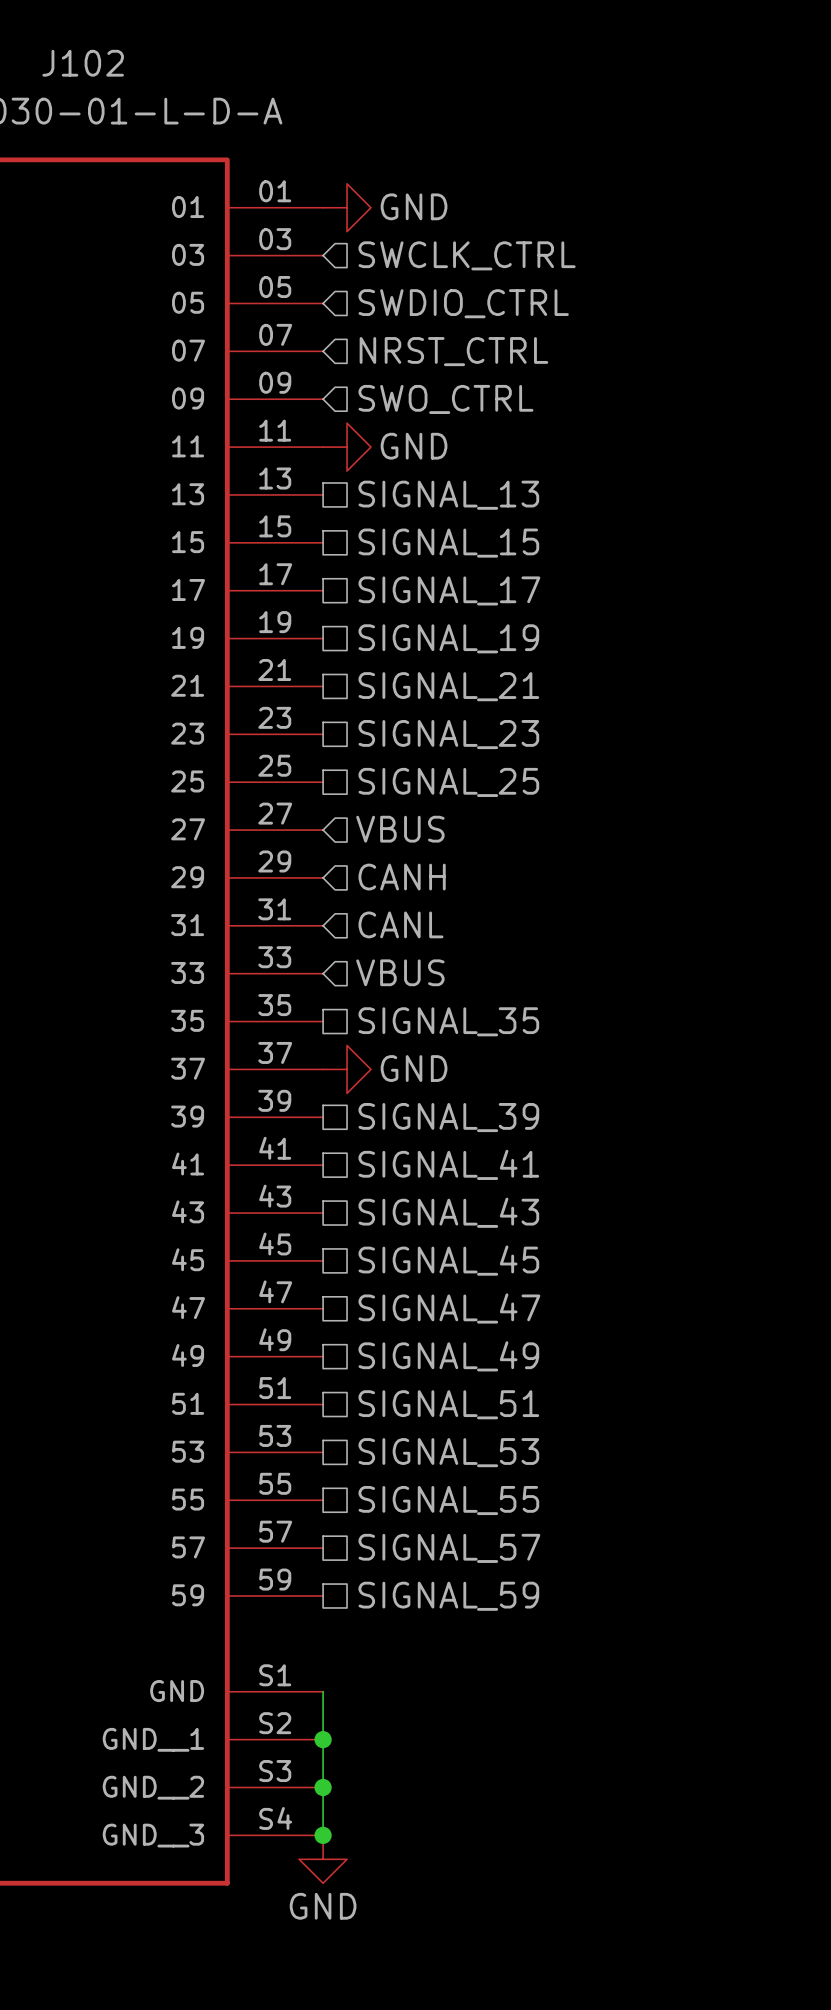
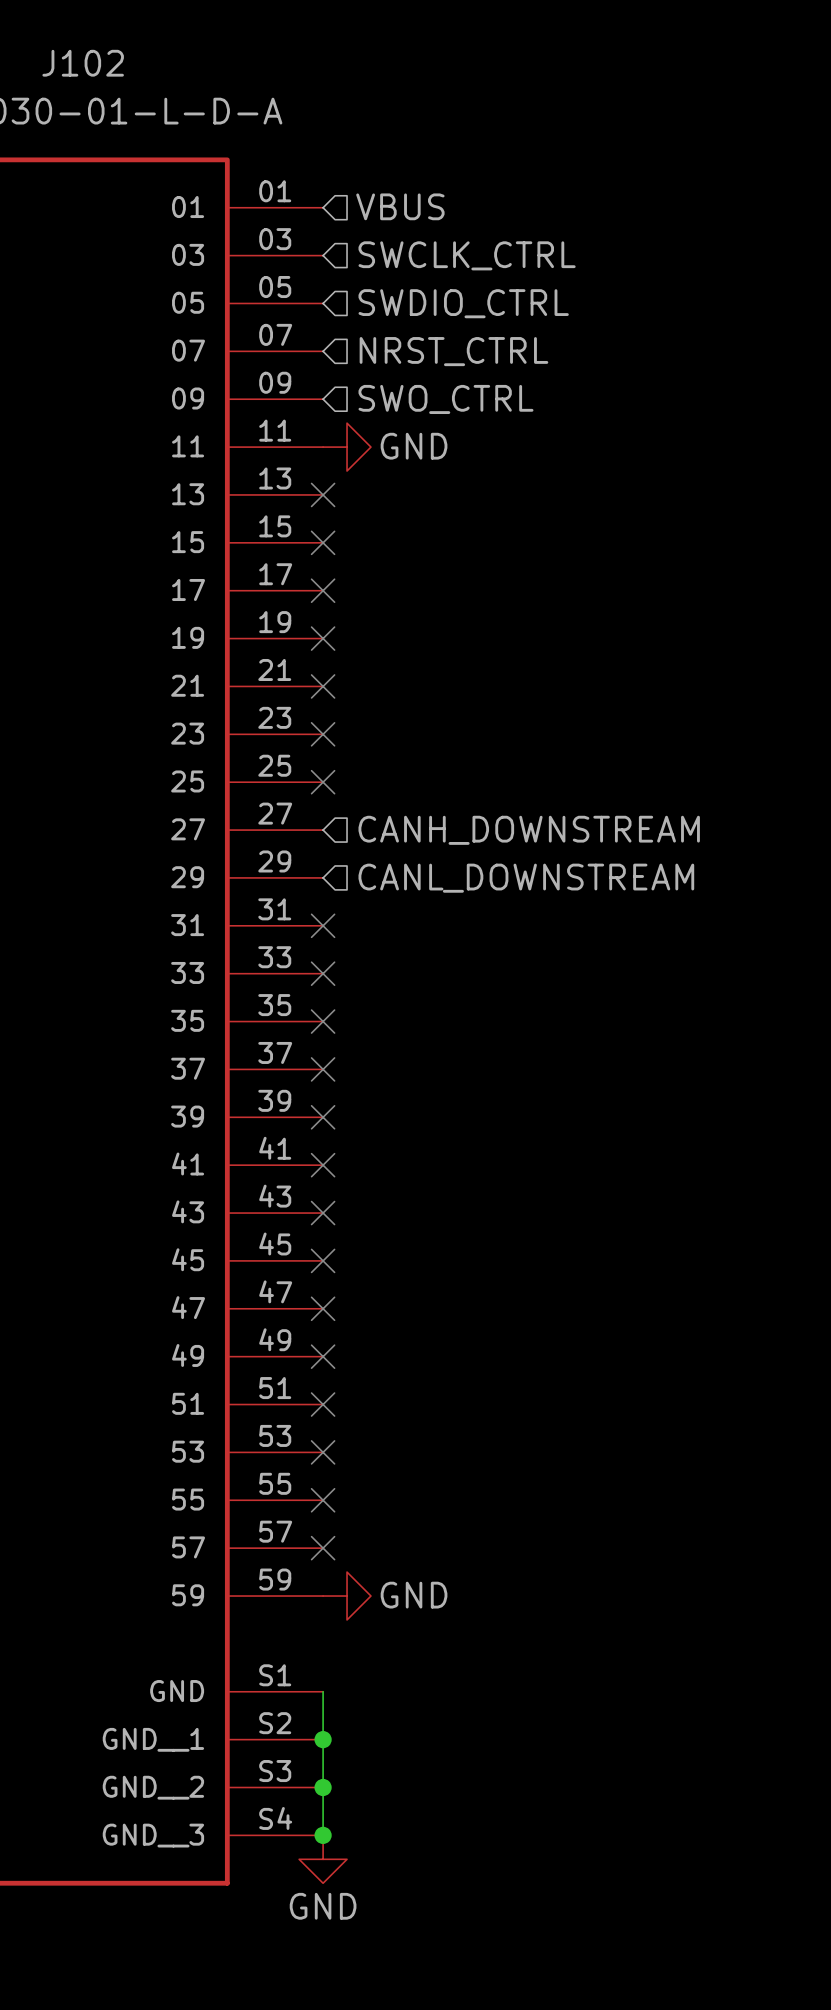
hierarchical label: none -> VBUS (400, 206)
power symbol: GND (347, 207) -> none
no-connect mark: none -> (323, 494)
hierarchical label: SIGNAL_13 (448, 495) -> none
no-connect mark: none -> (323, 542)
hierarchical label: SIGNAL_15 (448, 543) -> none
no-connect mark: none -> (323, 590)
hierarchical label: SIGNAL_17 (449, 590) -> none
no-connect mark: none -> (323, 638)
hierarchical label: SIGNAL_19 (448, 638) -> none
no-connect mark: none -> (323, 686)
hierarchical label: SIGNAL_21 (448, 686) -> none
no-connect mark: none -> (323, 734)
hierarchical label: SIGNAL_23 (448, 734) -> none
no-connect mark: none -> (323, 782)
hierarchical label: SIGNAL_25 (448, 782) -> none
hierarchical label: VBUS (400, 829) -> CANH_DOWNSTREAM (529, 830)
hierarchical label: CANH (402, 877) -> CANL_DOWNSTREAM (526, 878)
hierarchical label: CANL (400, 924) -> none
no-connect mark: none -> (323, 925)
hierarchical label: VBUS (400, 972) -> none
no-connect mark: none -> (323, 973)
no-connect mark: none -> (323, 1021)
hierarchical label: SIGNAL_35 (448, 1021) -> none
no-connect mark: none -> (323, 1069)
power symbol: GND (347, 1069) -> none
no-connect mark: none -> (323, 1117)
hierarchical label: SIGNAL_39 (448, 1117) -> none
hierarchical label: SIGNAL_41 (448, 1164) -> none
no-connect mark: none -> (323, 1165)
hierarchical label: SIGNAL_43 (448, 1212) -> none
no-connect mark: none -> (323, 1213)
no-connect mark: none -> (323, 1260)
hierarchical label: SIGNAL_45 (448, 1260) -> none
no-connect mark: none -> (323, 1308)
hierarchical label: SIGNAL_47 (449, 1308) -> none
no-connect mark: none -> (323, 1356)
hierarchical label: SIGNAL_49 (448, 1356) -> none
no-connect mark: none -> (323, 1404)
hierarchical label: SIGNAL_51 (448, 1404) -> none
no-connect mark: none -> (323, 1452)
hierarchical label: SIGNAL_53 (448, 1452) -> none
no-connect mark: none -> (323, 1500)
hierarchical label: SIGNAL_55 (448, 1500) -> none
no-connect mark: none -> (323, 1548)
hierarchical label: SIGNAL_57 (449, 1548) -> none
power symbol: none -> GND (347, 1596)
hierarchical label: SIGNAL_59 (448, 1596) -> none

